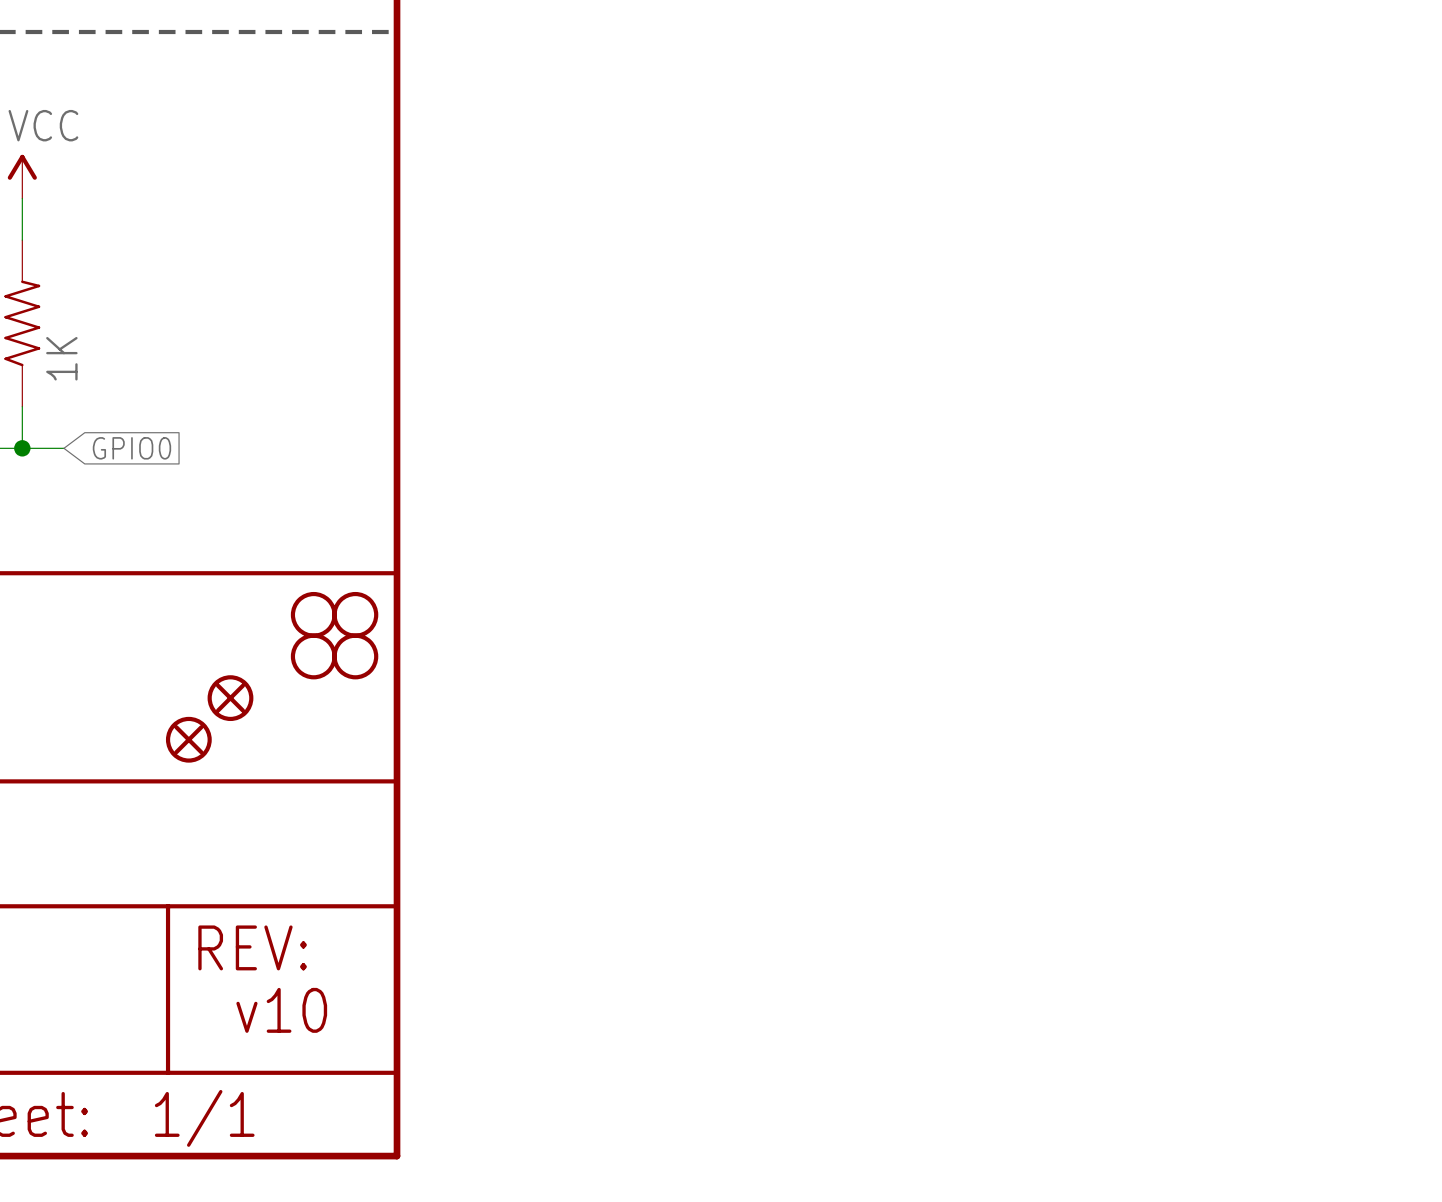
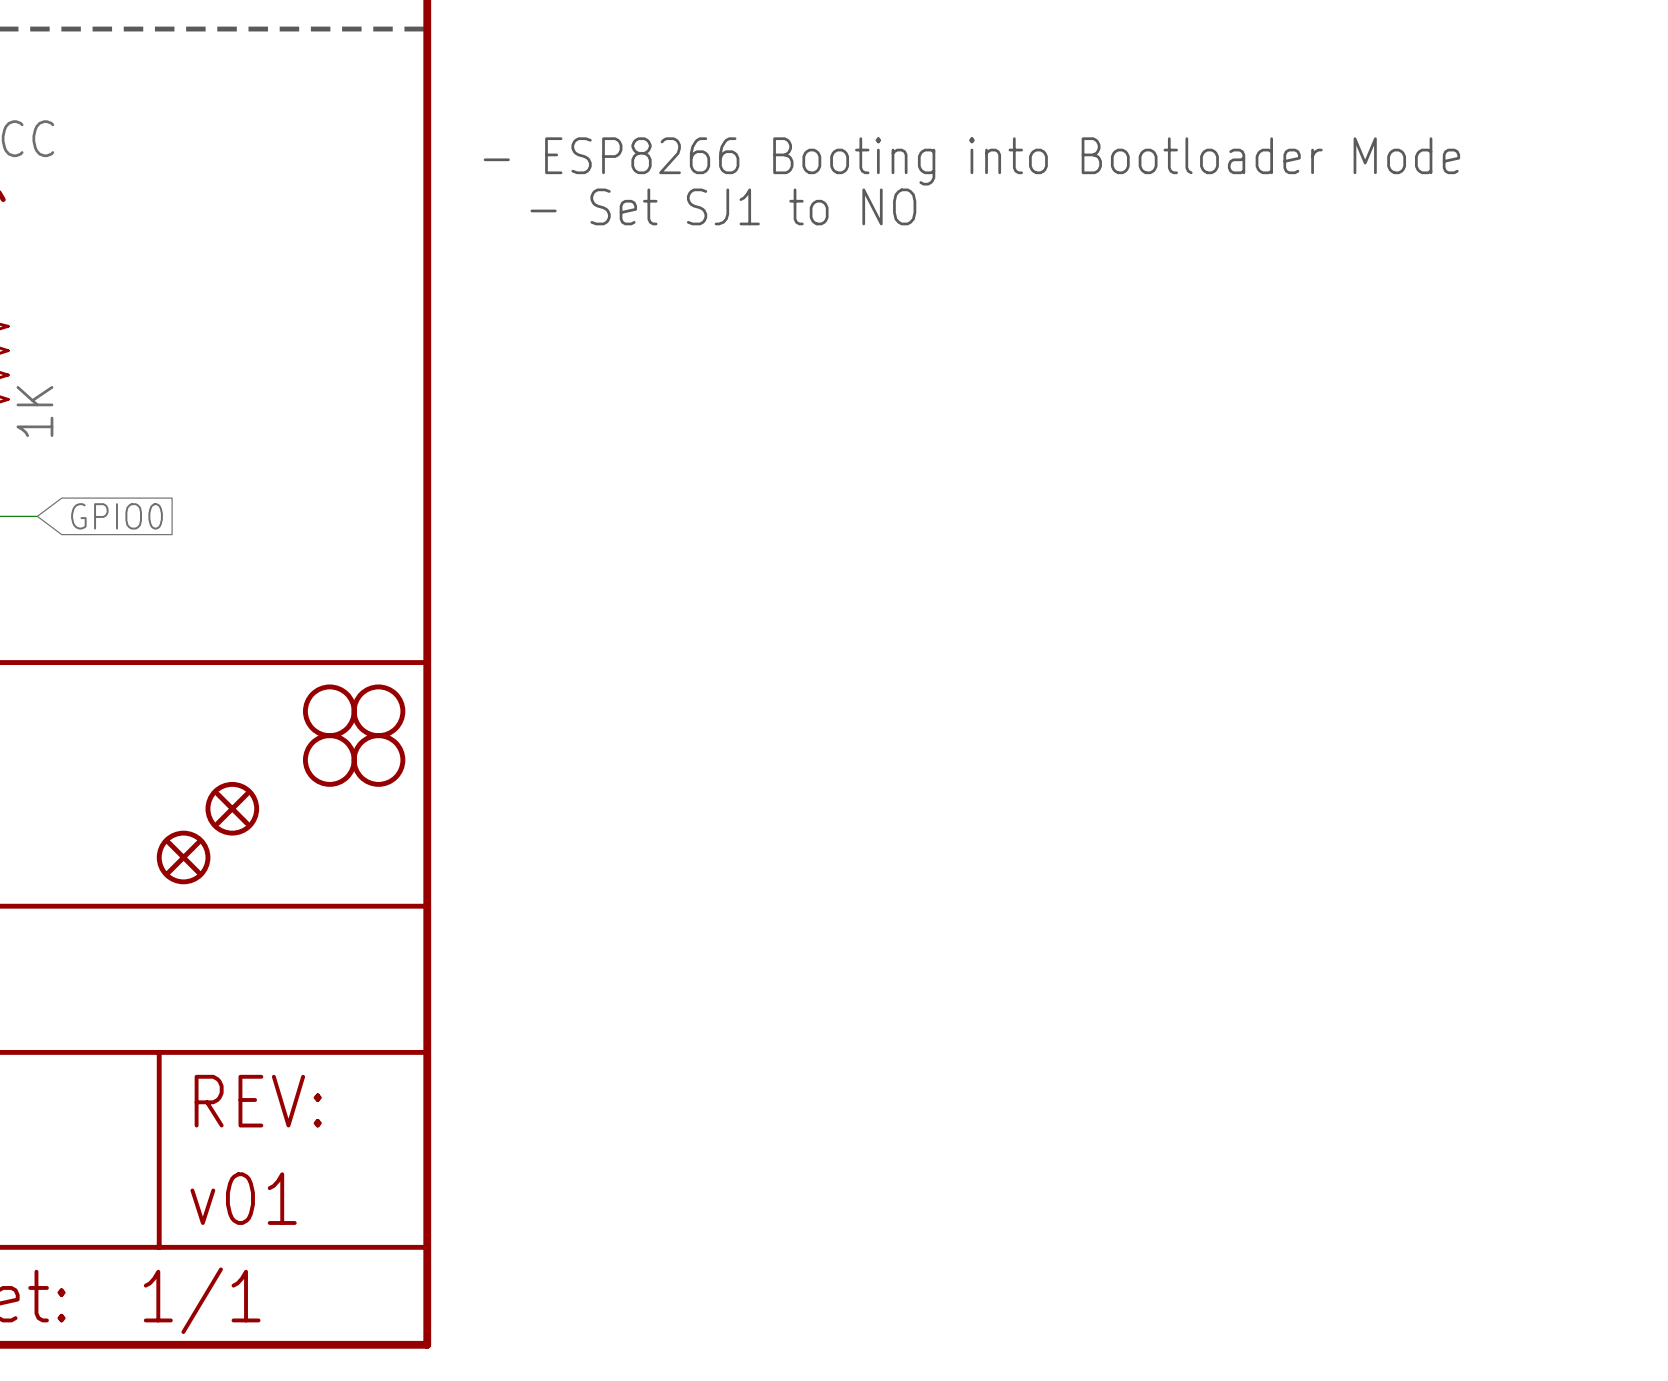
text: none -> - ESP8266 Booting into Bootloader Mode (971, 161)
text: none -> - Set SJ1 to NO (723, 206)
text: v10 (281, 1010) -> none
part text: none -> v01 (243, 1198)

